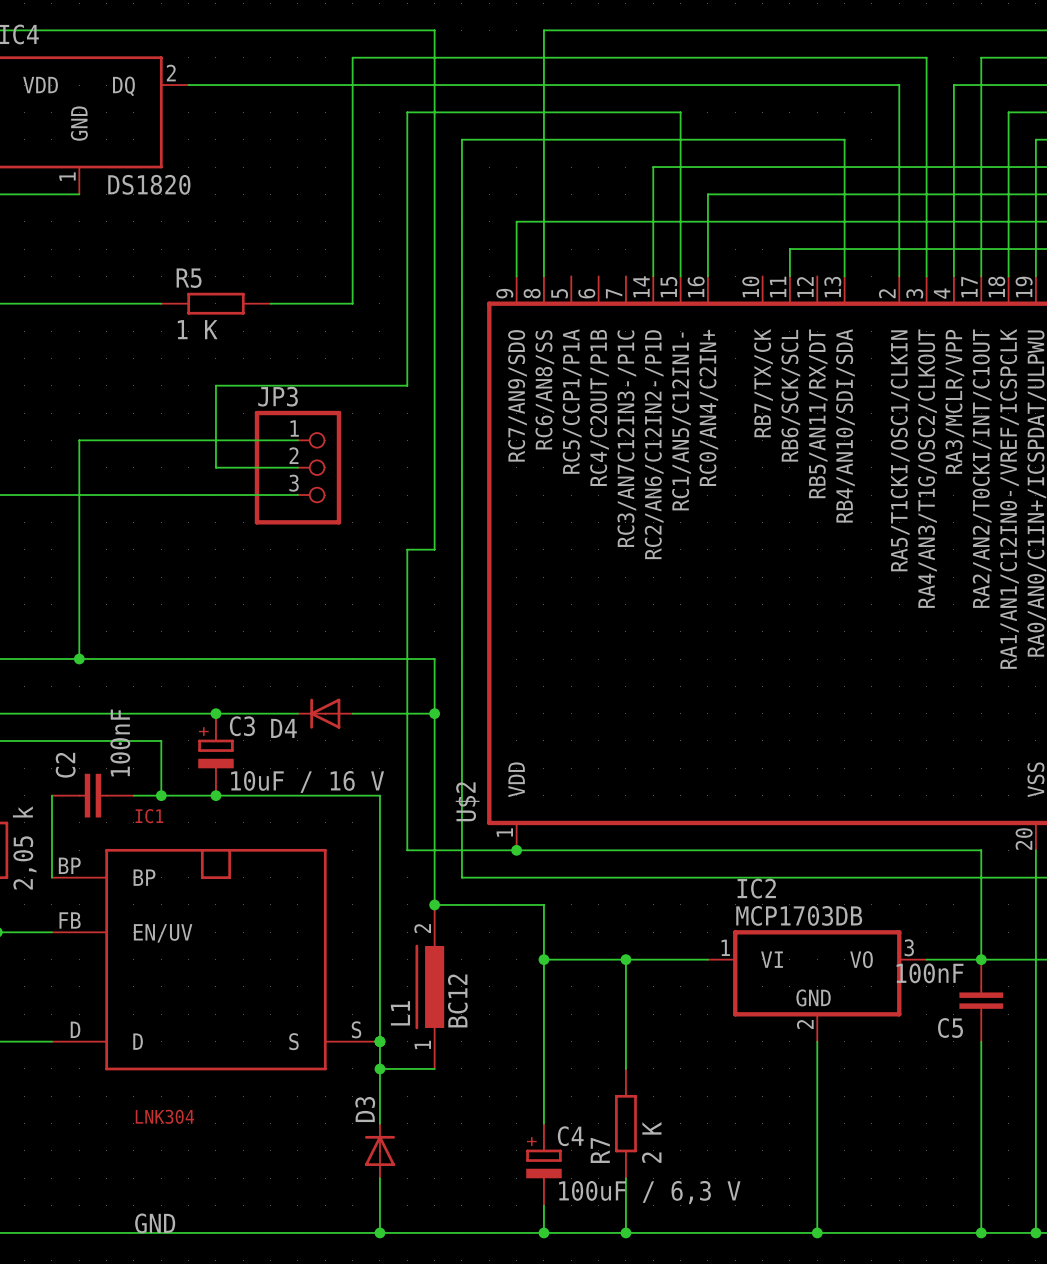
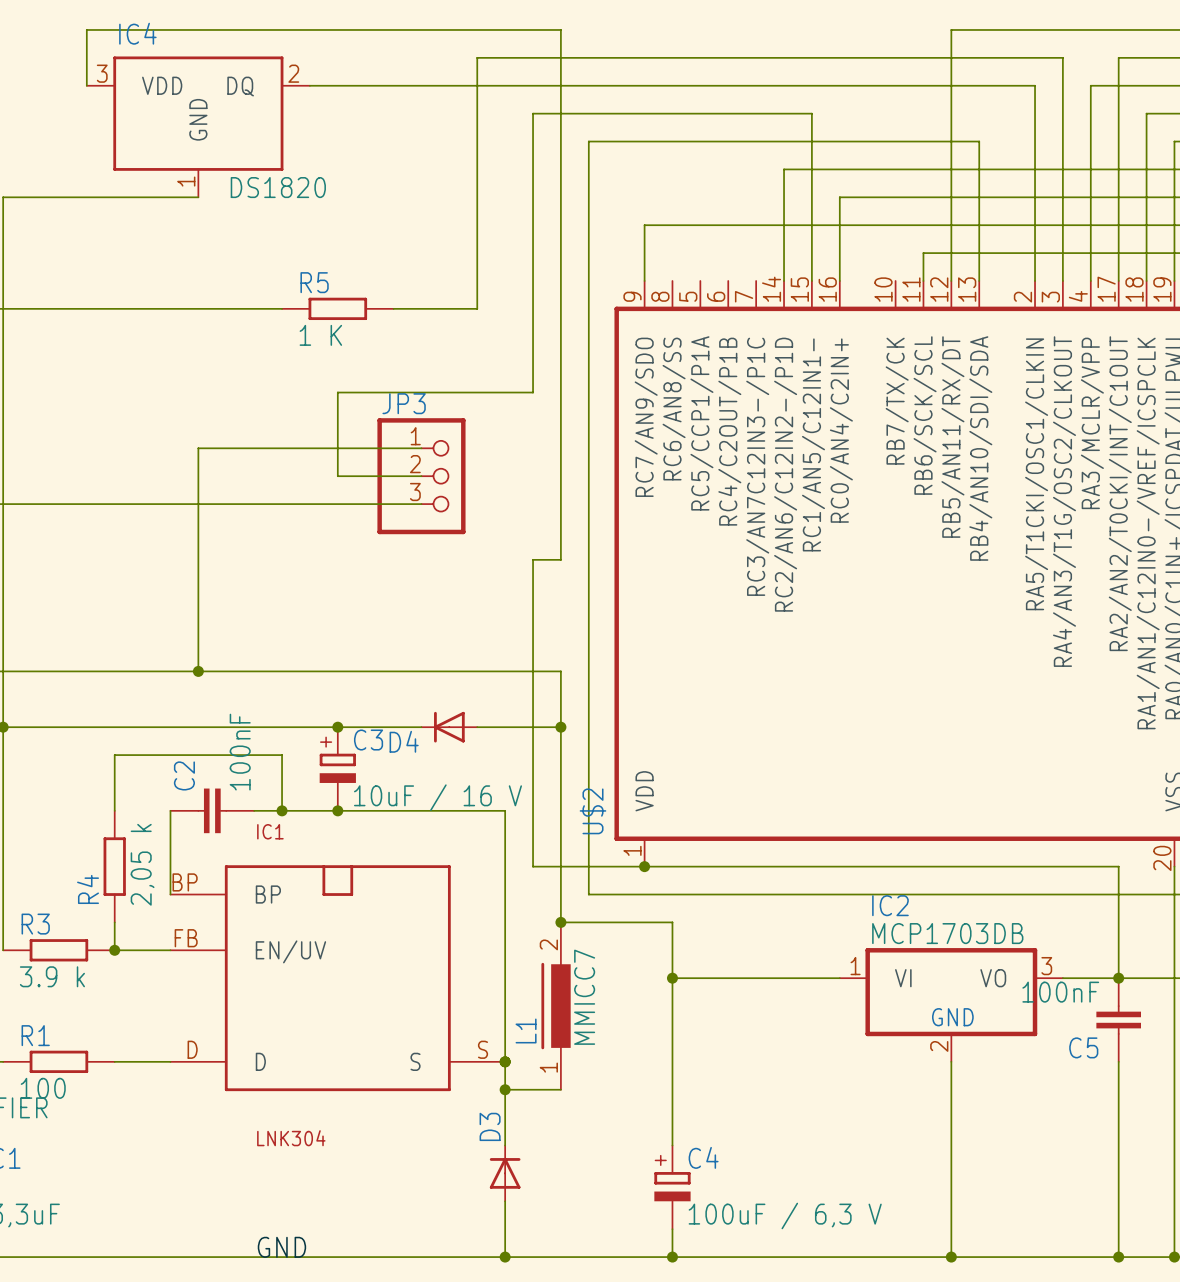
wire: (817, 30) (543, 30) (543, 276) -> (951, 29) (951, 280)
wire: (625, 959) (625, 1068) -> none
junction: (625, 959) -> none
L1 value: BC12 (457, 1000) -> MMICC7 (584, 997)
R7: 2 K (625, 1123) -> none
wire: (625, 1178) (625, 1232) -> none
junction: (625, 1232) -> none

